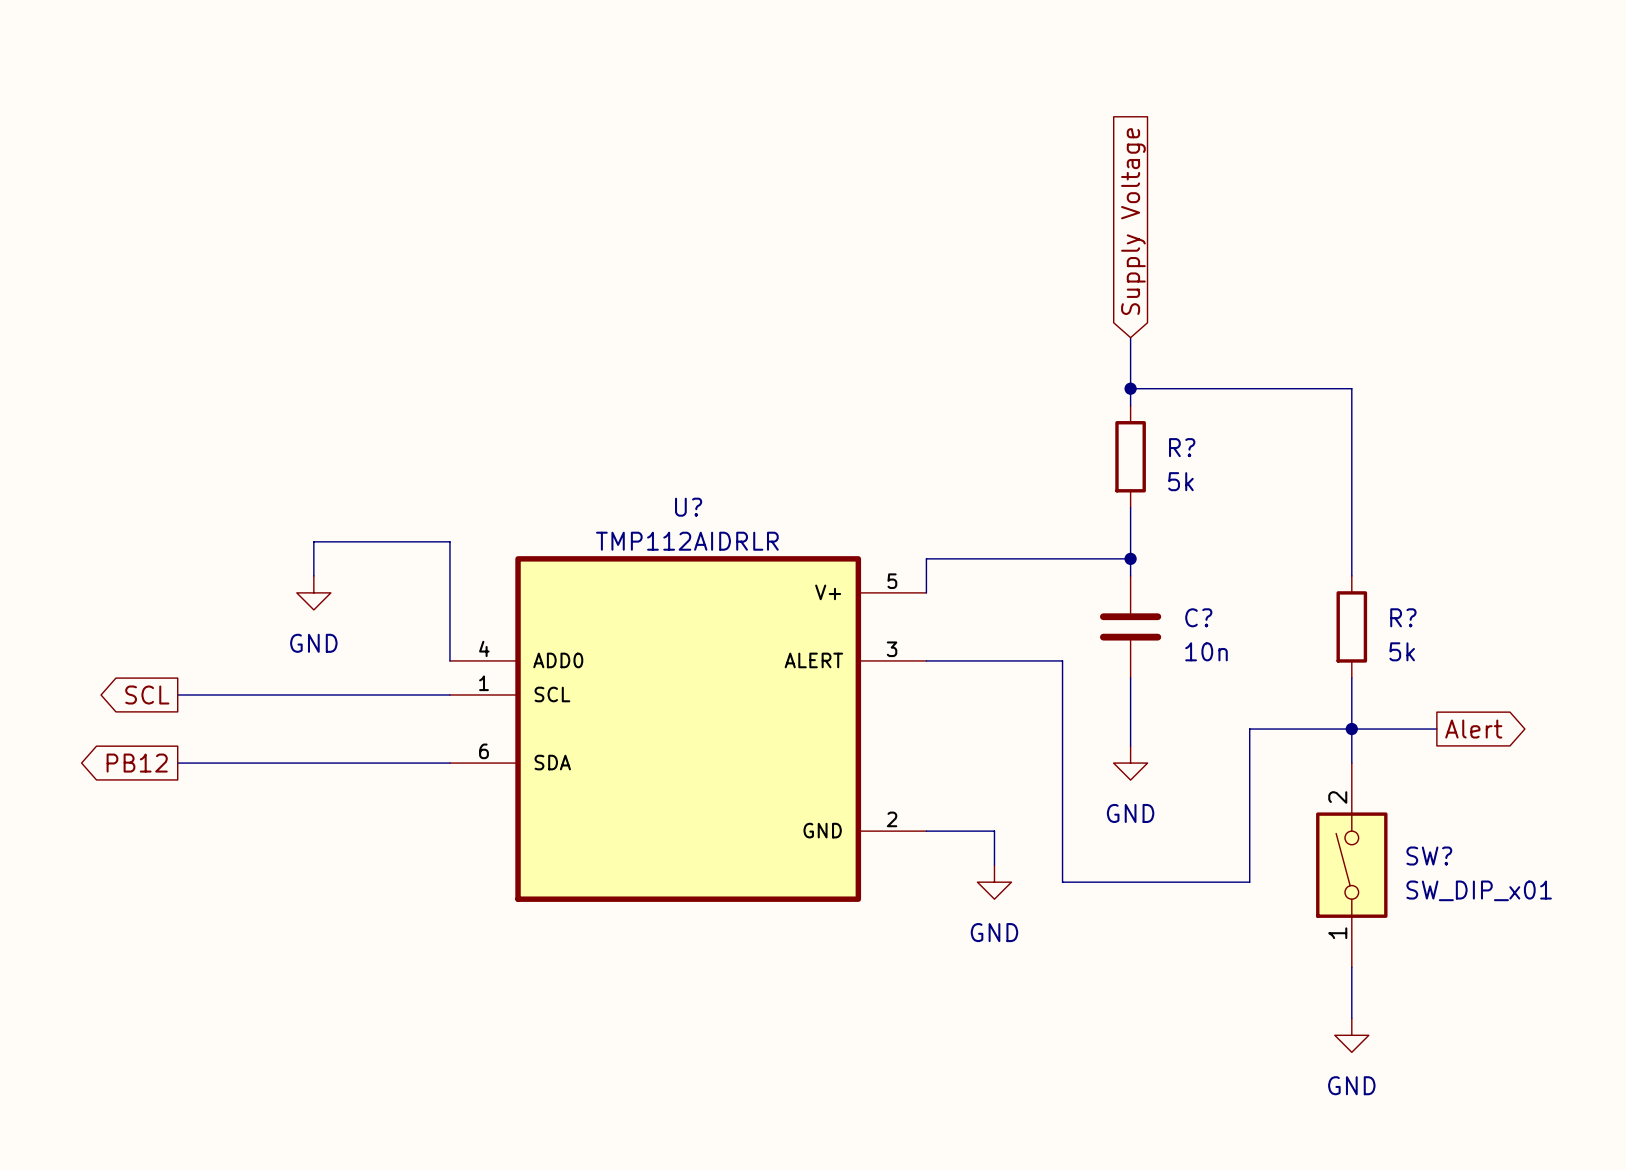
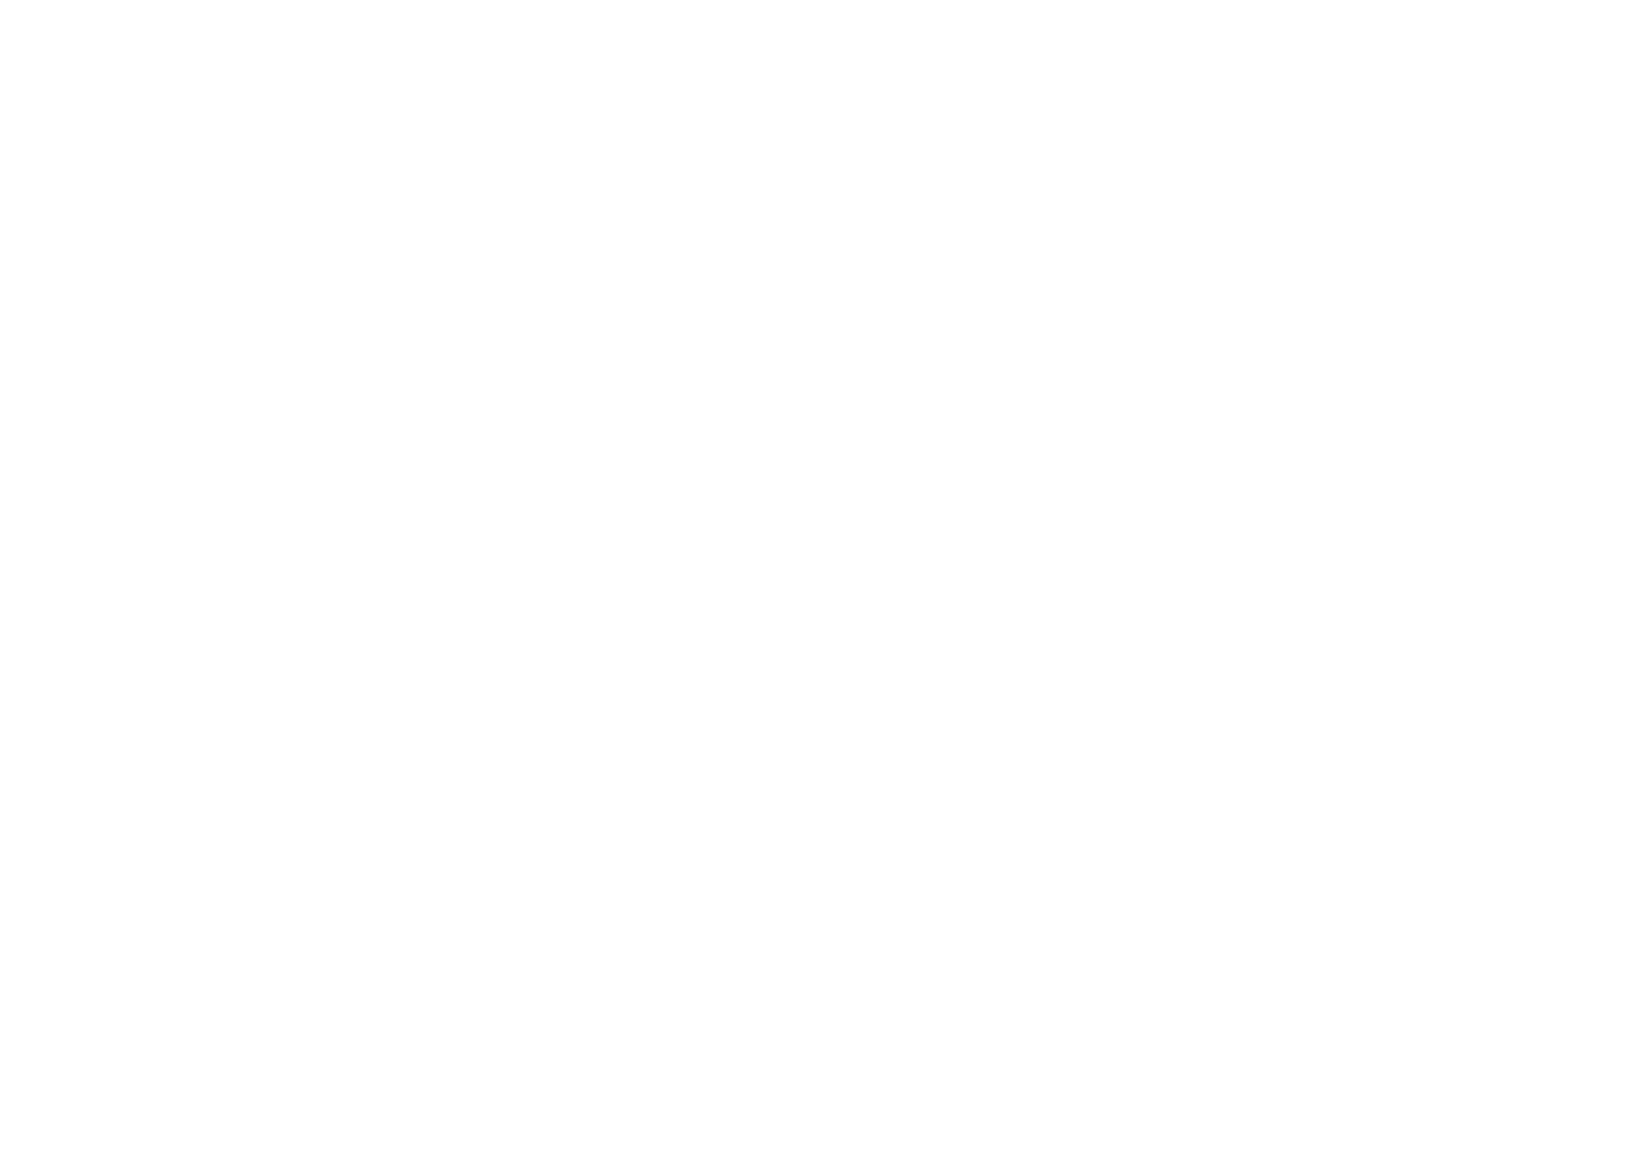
global label: Supply Voltage (1133, 221) -> none
wire: (1130, 337) (1130, 405) -> none
wire: (1130, 388) (1351, 388) (1351, 575) -> none
junction: (1130, 388) -> none
R?: 5k (1130, 456) -> none
wire: (1130, 507) (1130, 575) -> none
wire: (1130, 558) (926, 558) (926, 592) -> none
junction: (1130, 558) -> none
wire: (313, 575) (313, 541) (449, 541) (449, 660) -> none
power symbol: GND (313, 592) -> none
C?: 10n (1130, 626) -> none
R?: 5k (1351, 626) -> none
wire: (926, 660) (1062, 660) (1062, 882) (1249, 882) (1249, 729) (1436, 729) -> none
wire: (1130, 677) (1130, 746) -> none
wire: (1351, 677) (1351, 763) -> none
global label: SCL (147, 694) -> none
wire: (177, 694) (449, 694) -> none
U?: TMP112AIDRLR (688, 729) -> none
junction: (1351, 729) -> none
global label: Alert (1473, 729) -> none
global label: PB12 (137, 763) -> none
wire: (177, 763) (449, 763) -> none
power symbol: GND (1130, 763) -> none
wire: (926, 831) (994, 831) (994, 865) -> none
SW?: SW_DIP_x01 (1351, 865) -> none
power symbol: GND (994, 882) -> none
wire: (1351, 967) (1351, 1018) -> none
power symbol: GND (1351, 1035) -> none

